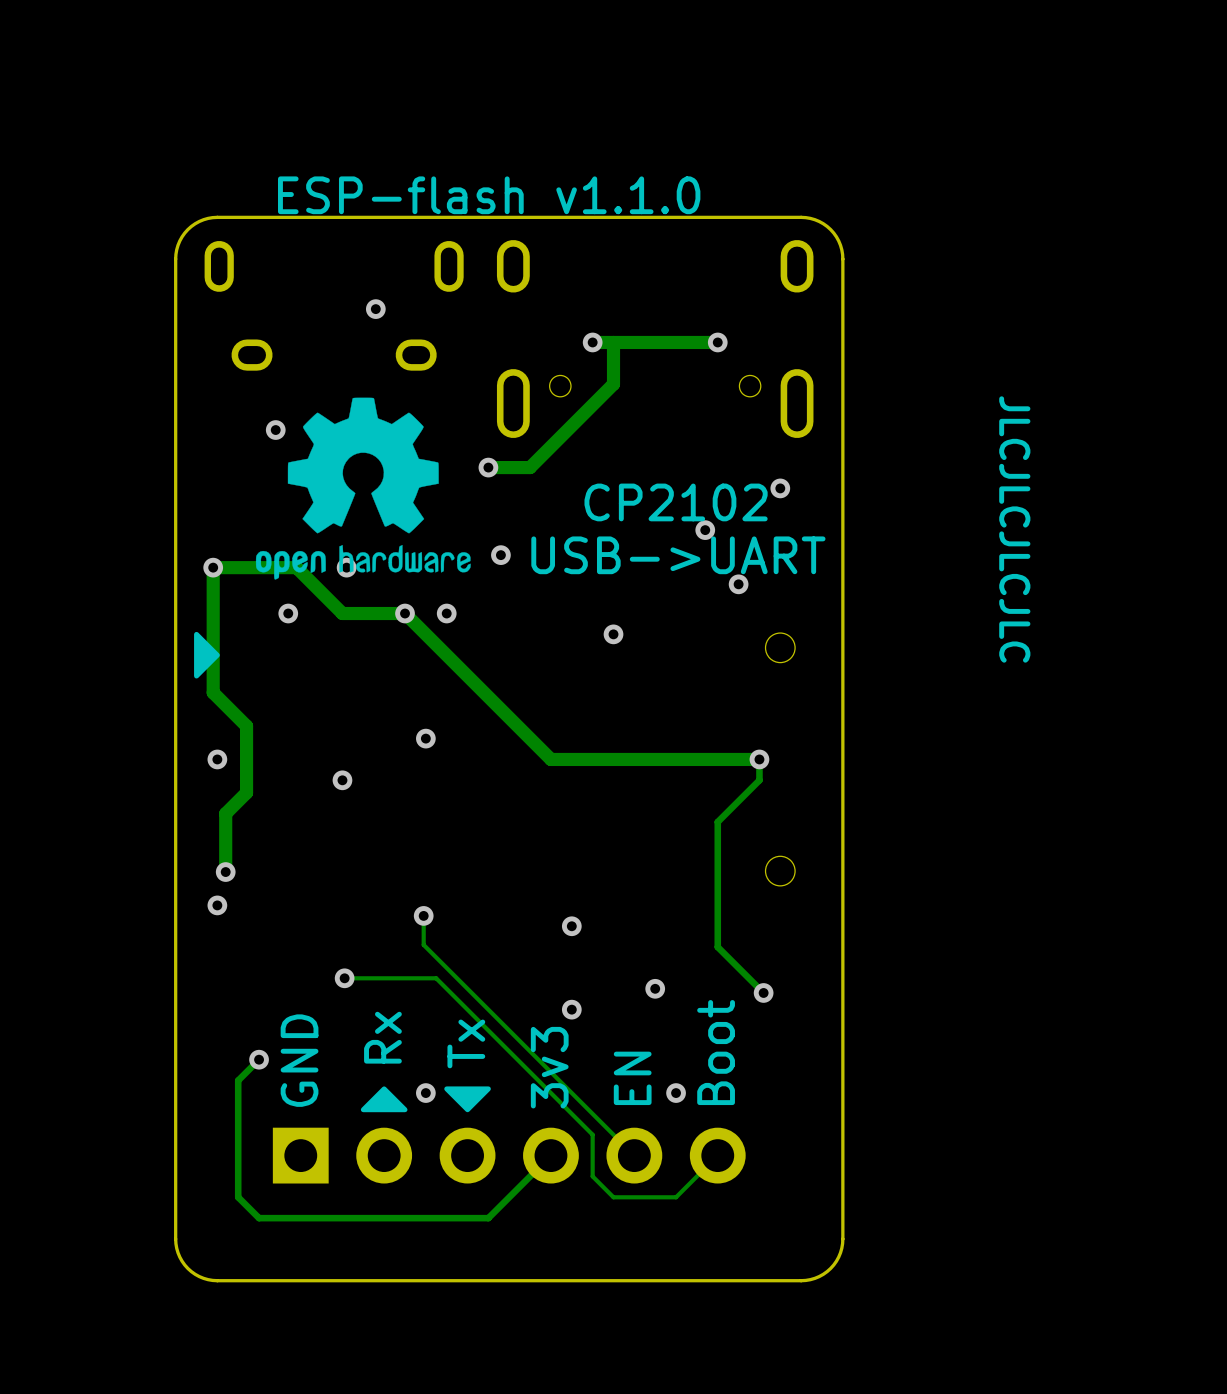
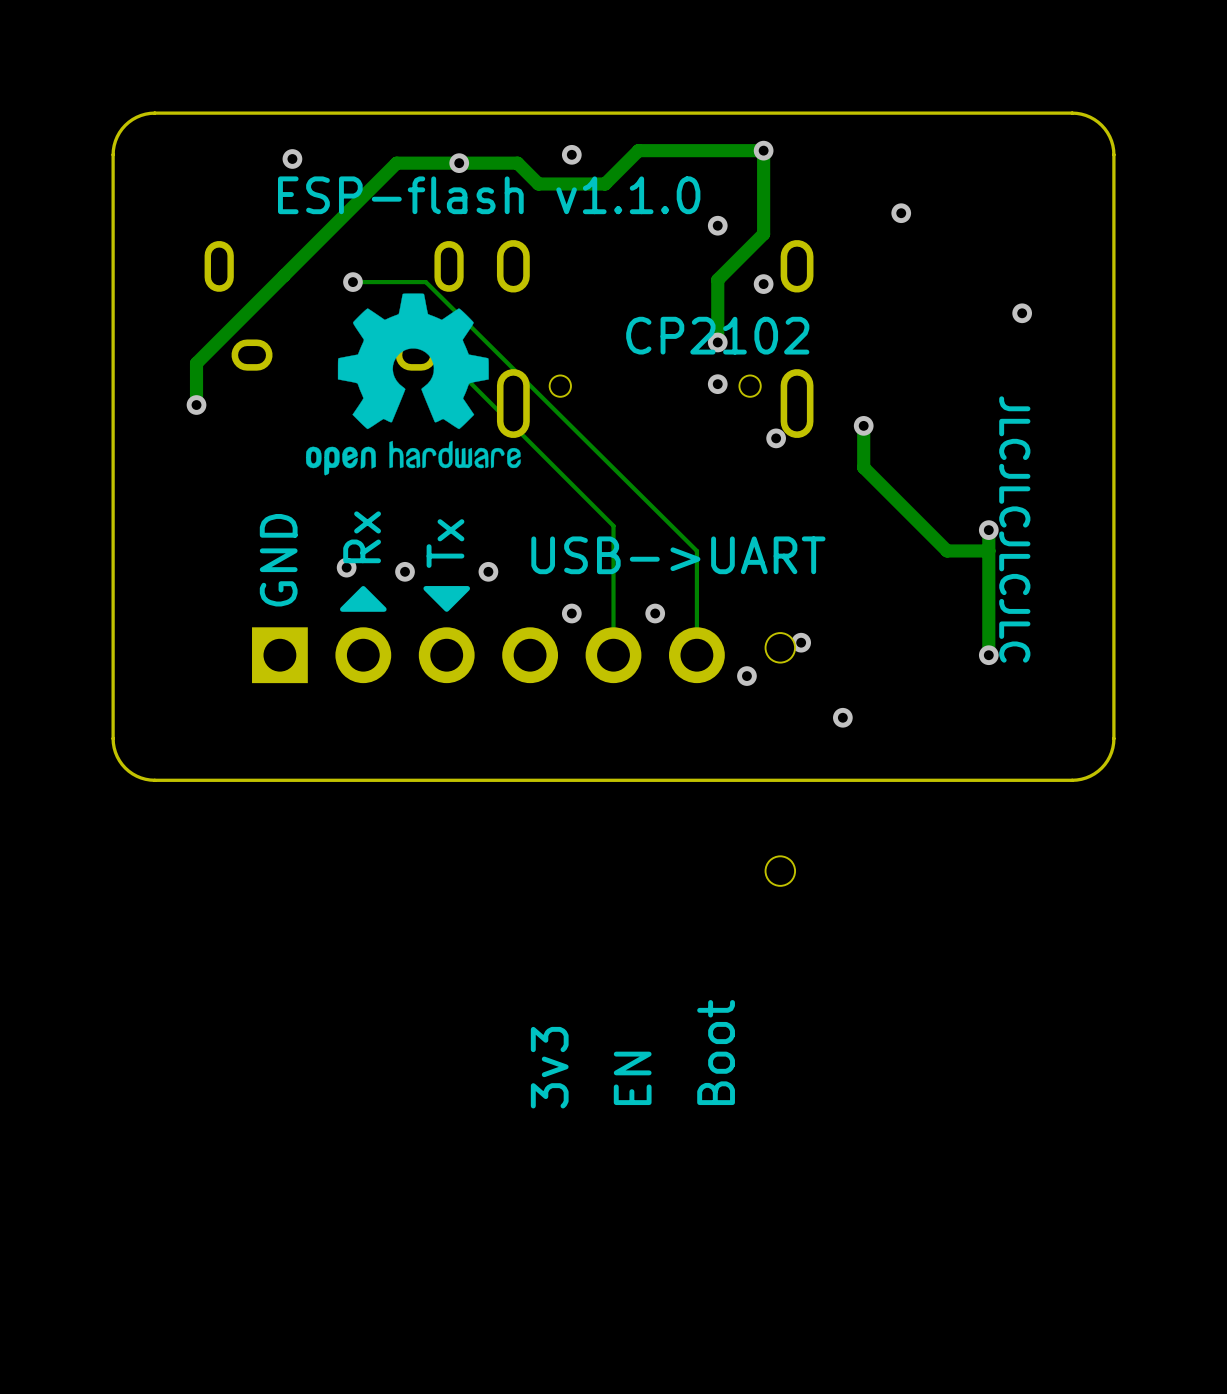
board edge: none -> (1072, 113) (154, 113) (141, 115) (132, 119) (125, 125) (117, 136) (113, 154) (113, 738) (115, 752) (119, 760) (132, 773) (141, 777) (154, 780) (1072, 780) (1081, 779) (1094, 773) (1104, 764) (1109, 756) (1113, 738) (1113, 154) (1111, 141) (1101, 125) (1090, 117) (1072, 113)
via: none -> (763, 150)
via: none -> (571, 154)
via: none -> (292, 158)
via: none -> (459, 163)
via: none -> (901, 213)
board edge: (801, 217) (217, 217) (208, 218) (195, 223) (182, 236) (176, 249) (175, 259) (175, 1239) (179, 1257) (184, 1265) (195, 1274) (208, 1279) (217, 1280) (801, 1280) (810, 1279) (823, 1274) (836, 1261) (840, 1252) (842, 1239) (842, 259) (840, 245) (830, 229) (814, 219) (801, 217) -> none
via: none -> (717, 225)
track: none -> (352, 282) (425, 282) (696, 550) (696, 655)
via: none -> (763, 284)
via position: (375, 309) -> (352, 282)
via: none -> (1022, 313)
via: (592, 342) -> none
track: (613, 342) (613, 384) (530, 467) (488, 467) -> none
track: (717, 342) (592, 342) -> (717, 342) (717, 279) (763, 234) (763, 150) (638, 150) (605, 184) (538, 184) (517, 163) (396, 163) (196, 363) (196, 405)
track: none -> (415, 361) (448, 361) (613, 525) (613, 655)
via: none -> (717, 384)
via: none -> (196, 405)
track: none -> (863, 425) (863, 467) (947, 550) (988, 550)
via: none -> (863, 425)
via: (275, 430) -> none
via: (488, 467) -> none
drawing position: (363, 488) -> (413, 384)
via position: (780, 488) -> (776, 438)
text position: CP2102 (676, 502) -> CP2102 (717, 335)
via: (705, 530) -> none
track: none -> (988, 530) (988, 655)
via: none -> (988, 530)
via position: (500, 555) -> (488, 571)
via: (213, 567) -> none
via: none -> (405, 571)
via: (738, 584) -> none
via: (288, 613) -> none
via: (405, 613) -> none
via: (446, 613) -> none
via: none -> (571, 613)
via: none -> (655, 613)
drawing: [194, 631, 220, 679] -> none
via: (613, 634) -> none
via: none -> (801, 642)
via: none -> (988, 655)
via: none -> (746, 676)
via: none -> (842, 717)
via: (425, 738) -> none
via: (217, 759) -> none
via: (759, 759) -> none
via: (342, 780) -> none
track: (225, 872) (225, 813) (246, 792) (246, 726) (213, 692) (213, 567) (296, 567) (342, 613) (405, 613) (550, 759) (759, 759) (759, 780) (717, 822) (717, 947) (763, 992) -> none
via: (225, 872) -> none
via: (217, 905) -> none
track: (423, 915) (423, 944) (634, 1155) -> none
via: (423, 915) -> none
via: (571, 926) -> none
track: (344, 978) (436, 978) (592, 1134) (592, 1176) (613, 1197) (676, 1197) (717, 1155) -> none
via: (344, 978) -> none
via: (655, 988) -> none
via: (763, 992) -> none
via: (571, 1009) -> none
text position: Rx (382, 1037) -> Rx (362, 537)
text position: Tx (466, 1043) -> Tx (445, 543)
track: (259, 1059) (238, 1080) (238, 1197) (259, 1218) (488, 1218) (550, 1155) -> none
via: (259, 1059) -> none
text position: GND (299, 1060) -> GND (278, 560)
via: (425, 1093) -> none
via: (676, 1093) -> none
drawing position: (384, 1099) -> (363, 598)
drawing position: (467, 1099) -> (446, 598)
part position: (509, 1155) -> (488, 655)

